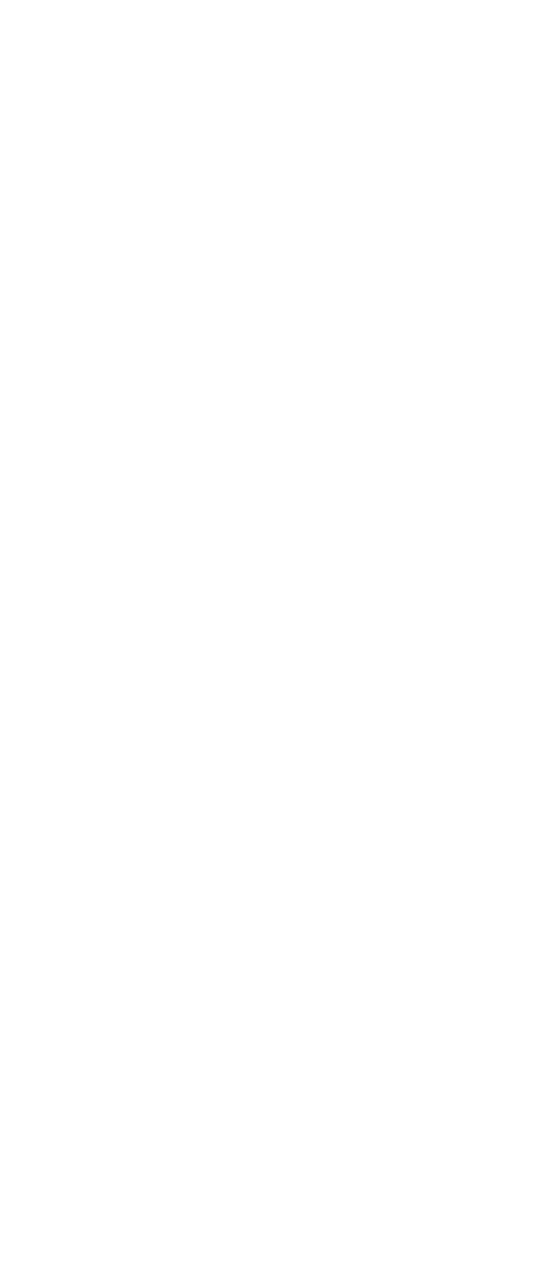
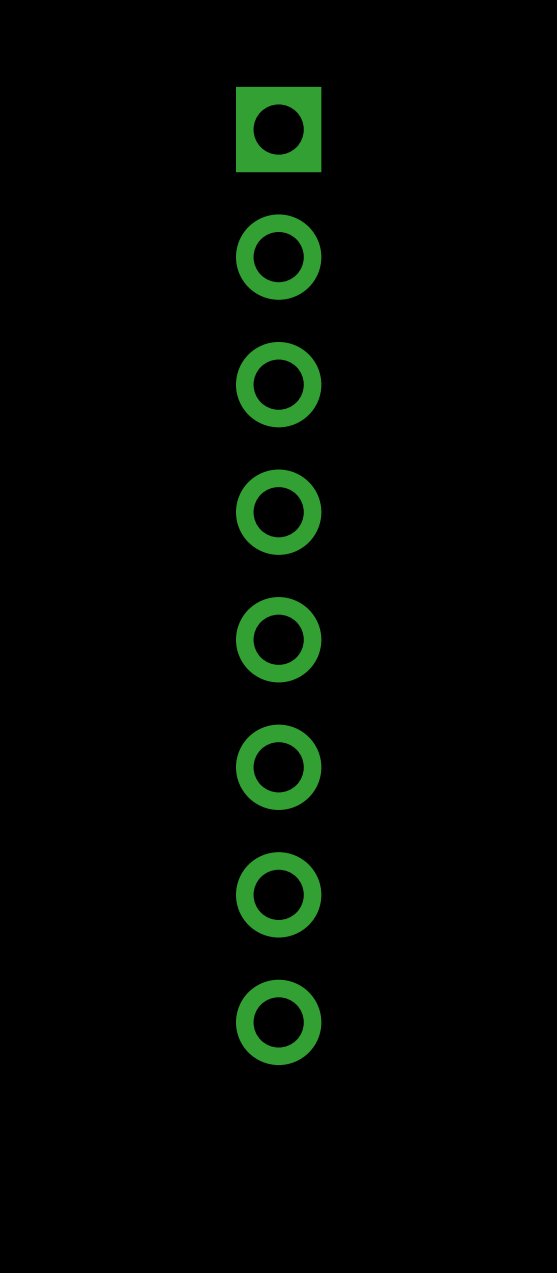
part: none -> (278, 575)

